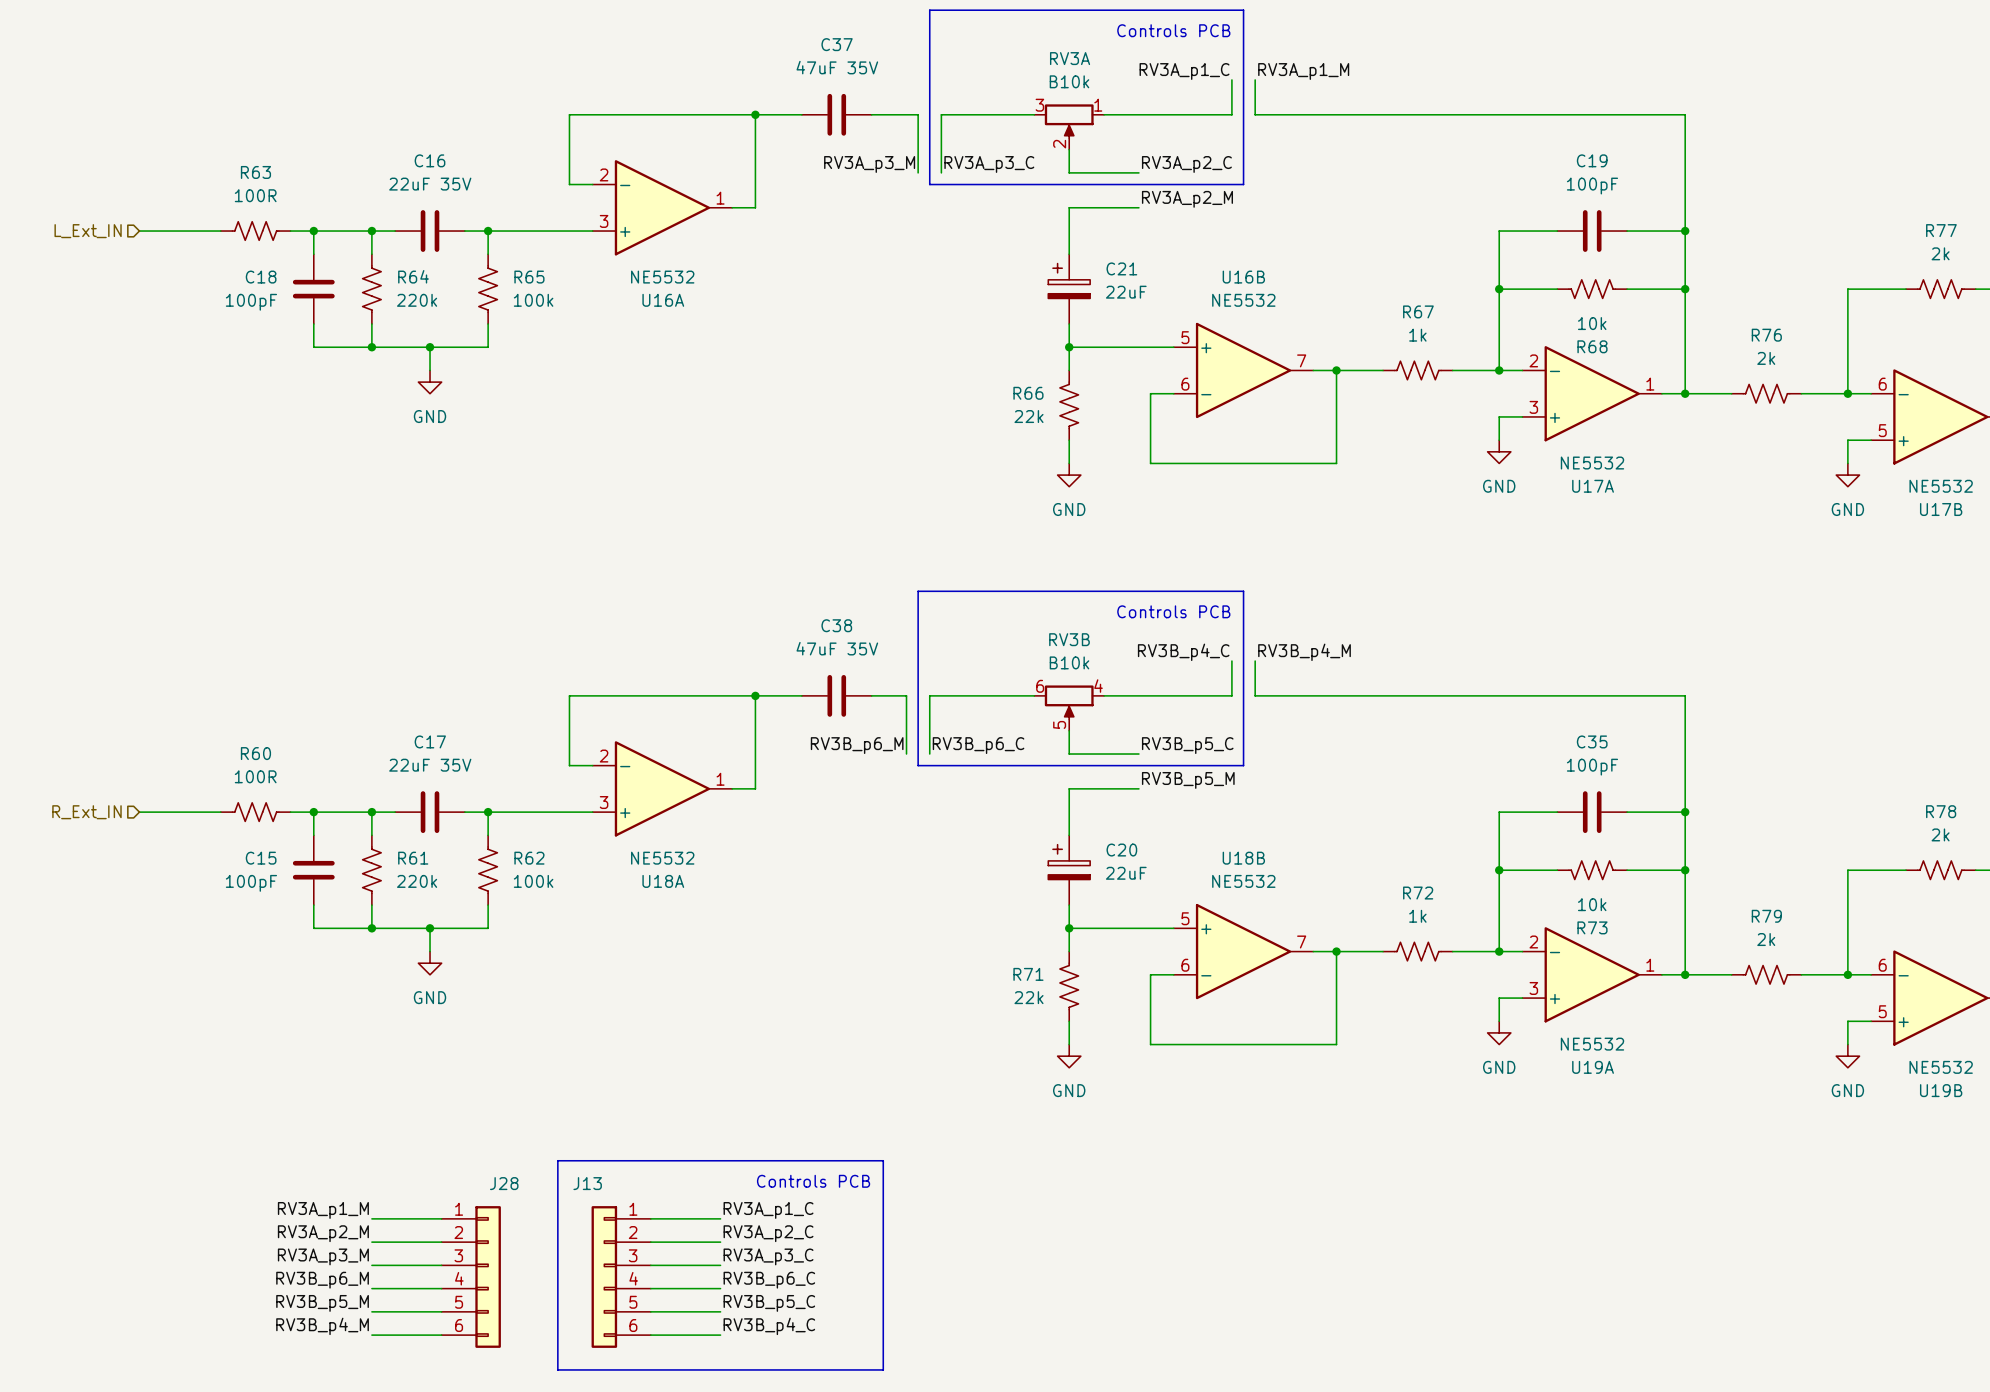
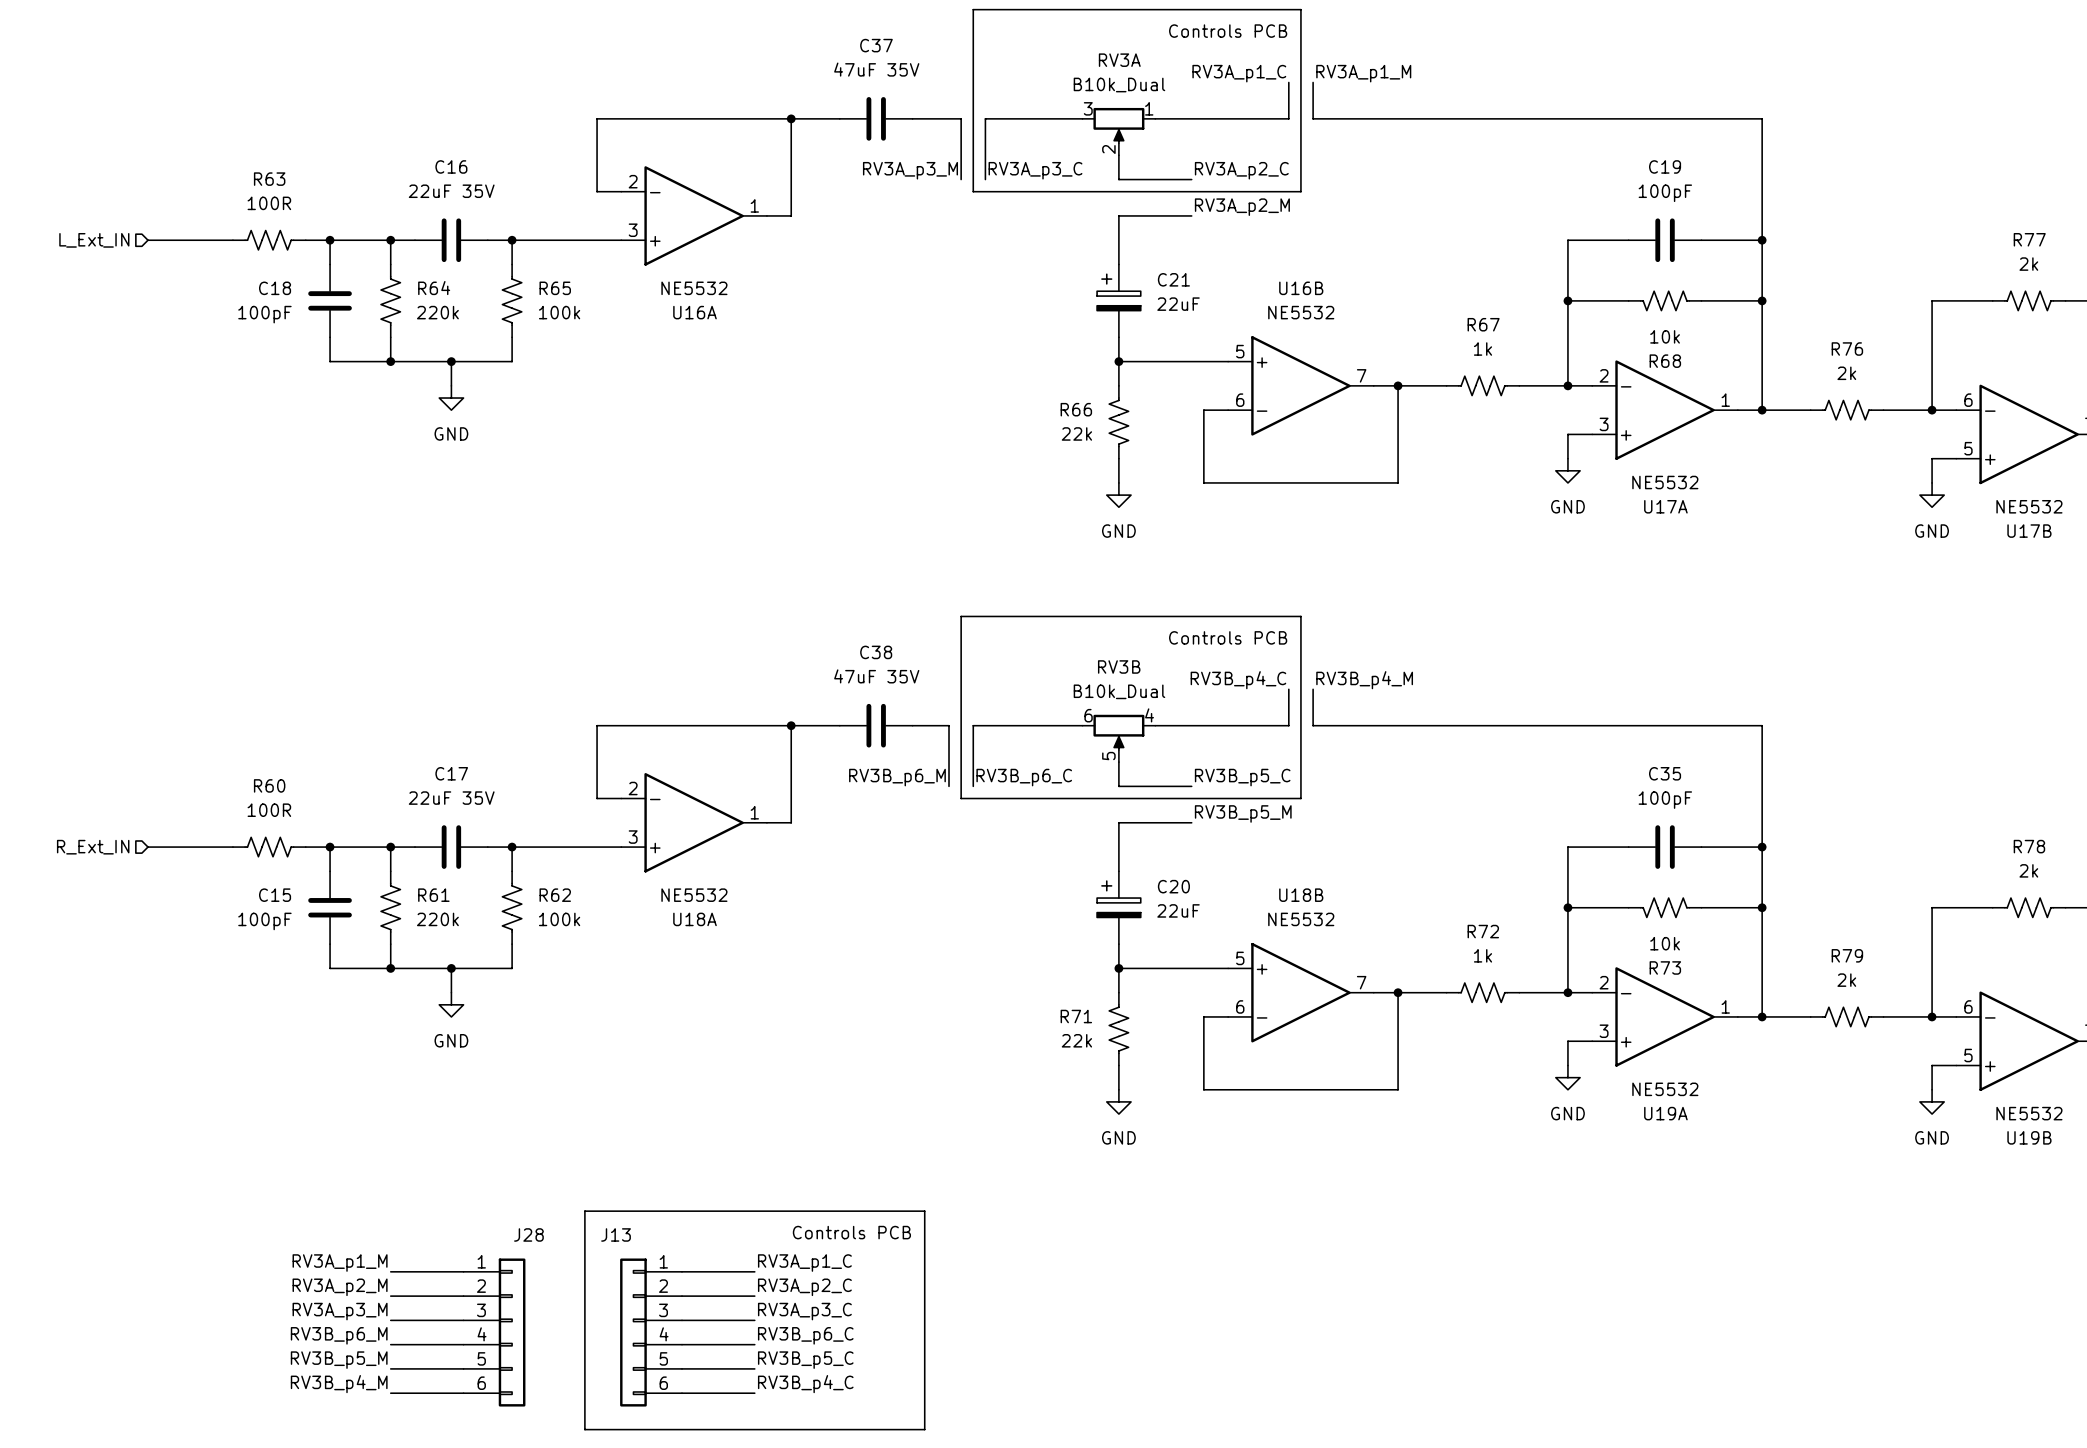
RV3A value: B10k (1069, 81) -> B10k_Dual (1119, 85)
RV3B value: B10k (1069, 662) -> B10k_Dual (1119, 691)

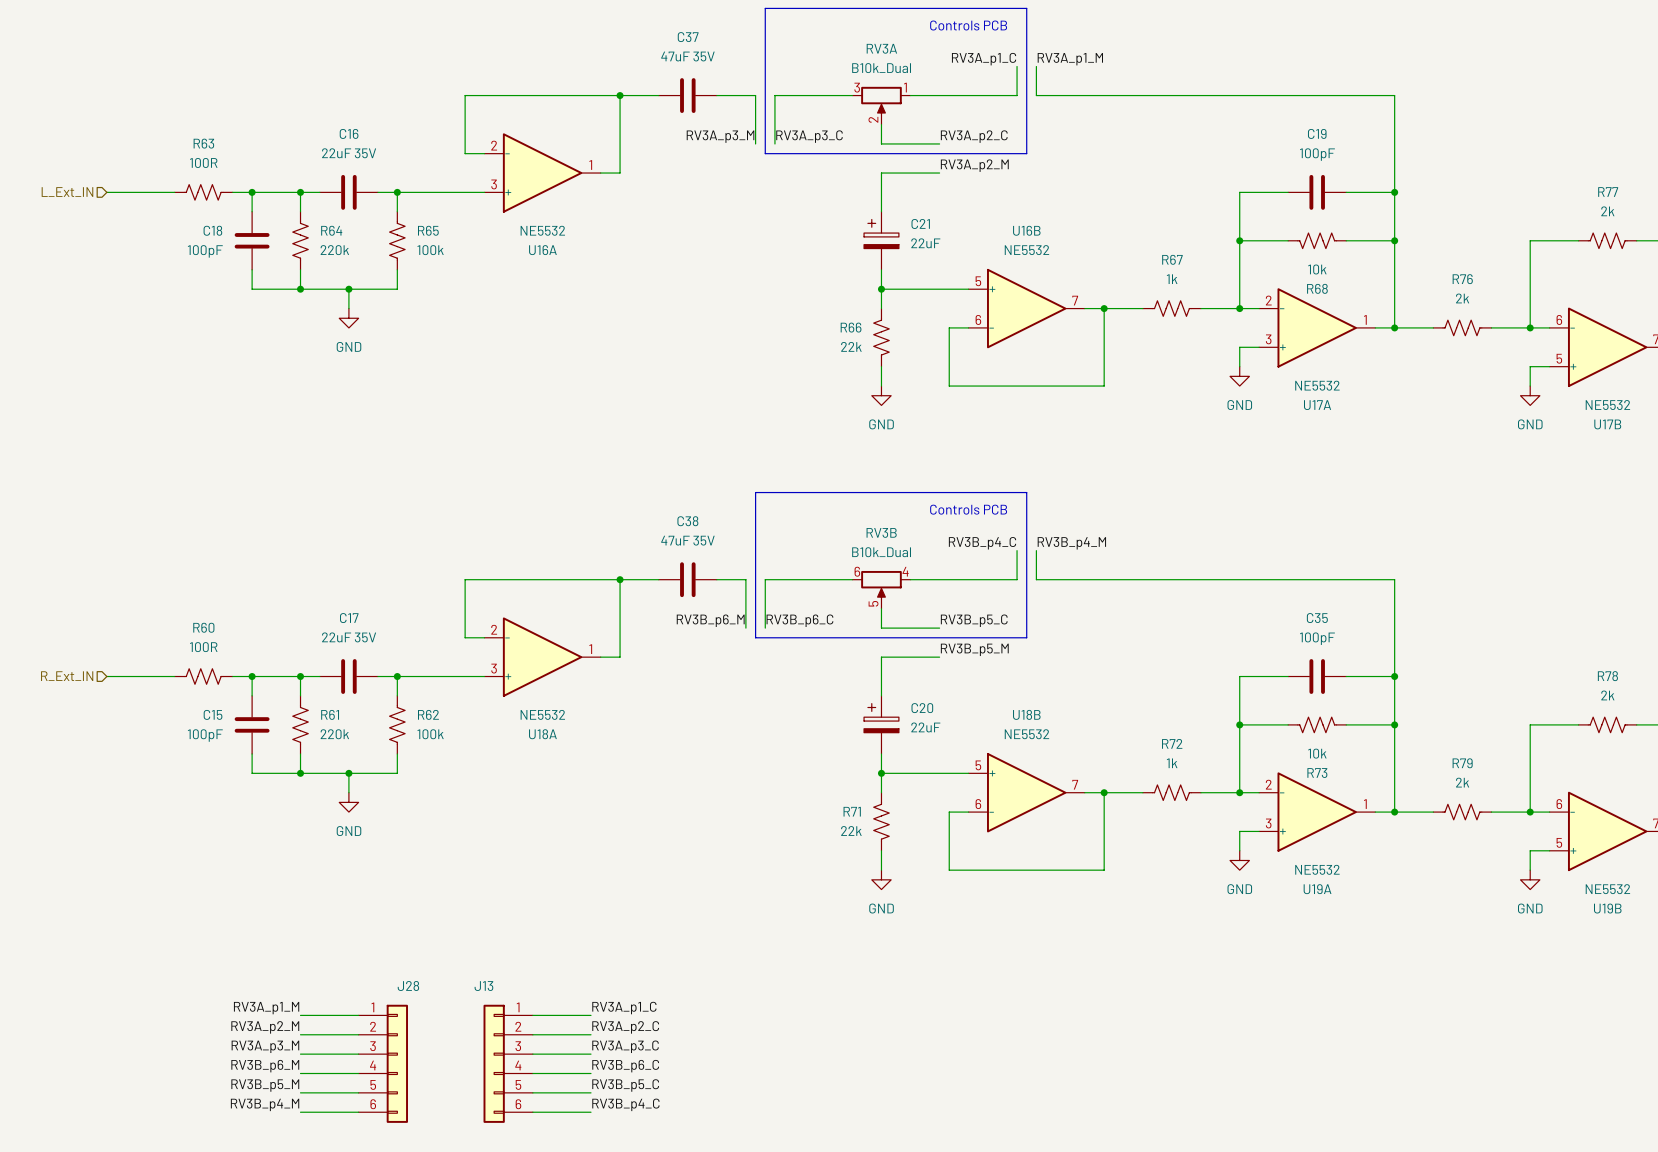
line: (584, 1211) (924, 1211) (924, 1429) (584, 1429) (584, 1211) -> none
text: Controls PCB (851, 1232) -> none

